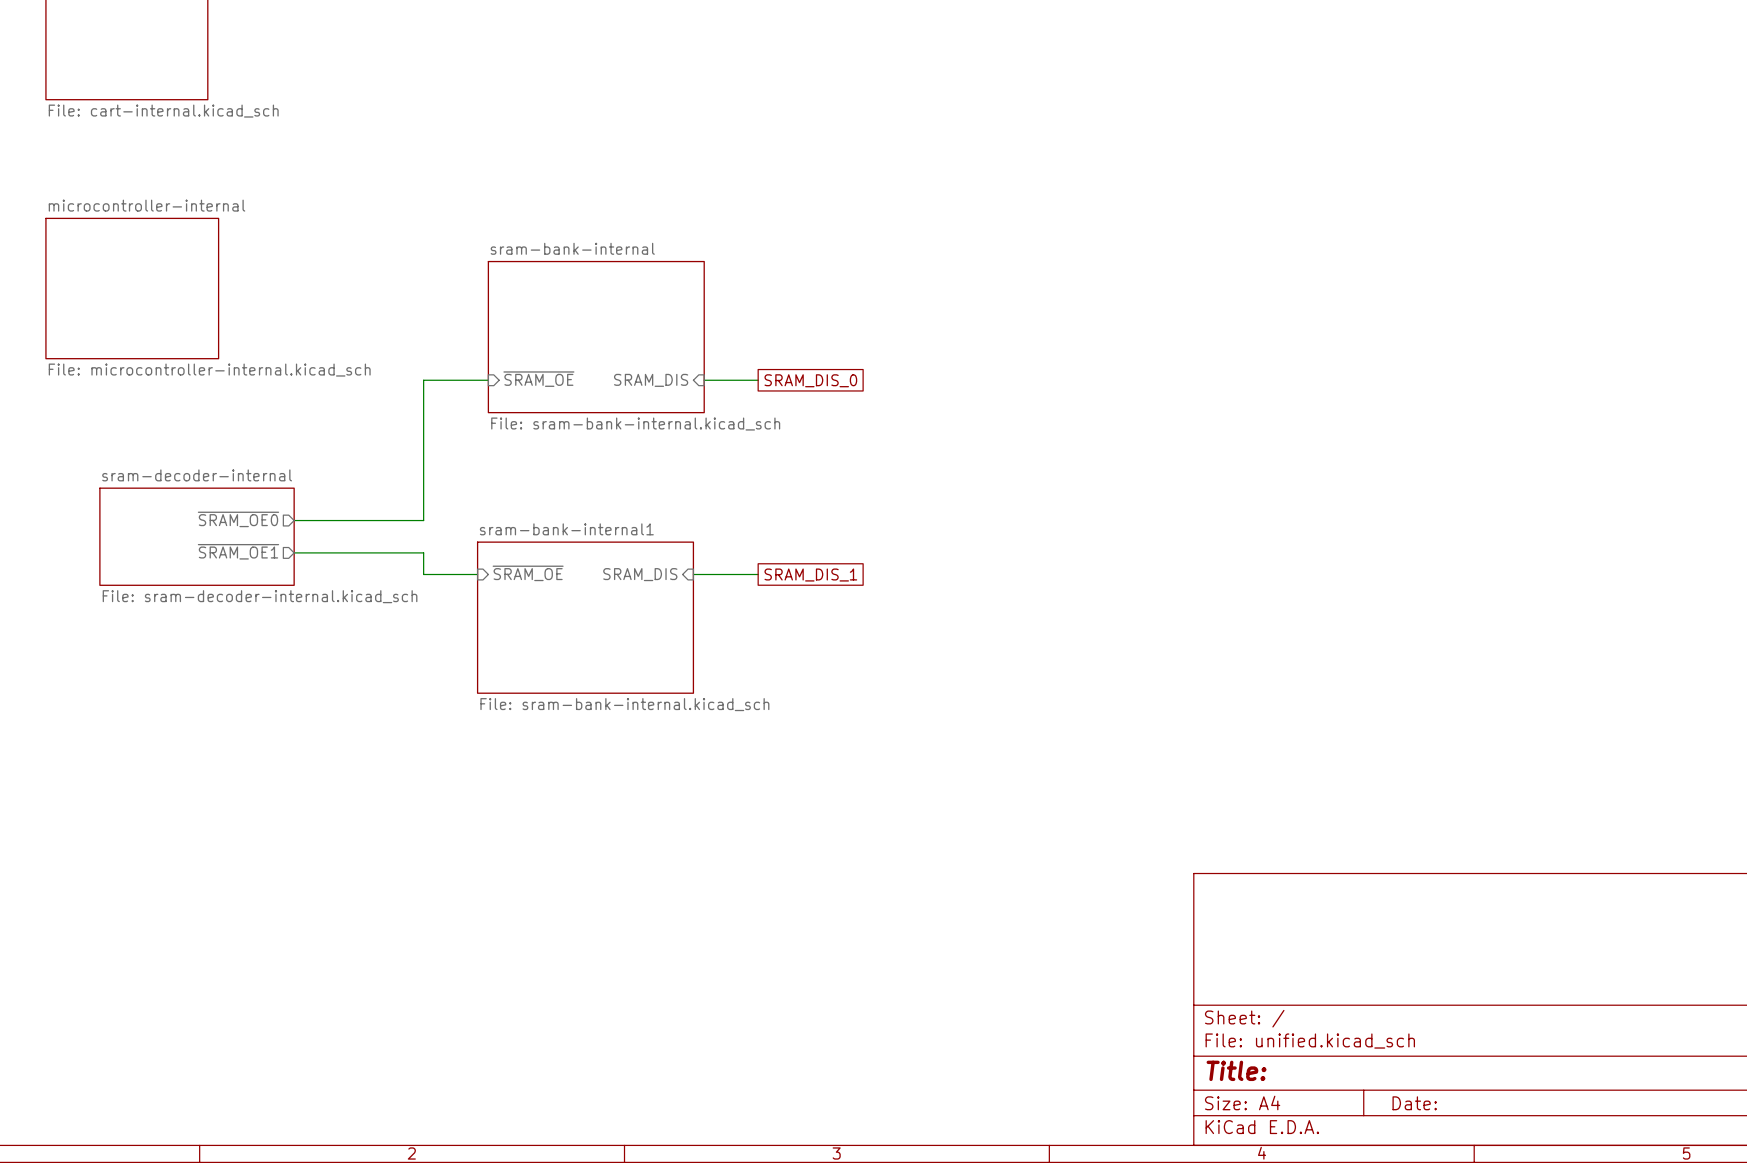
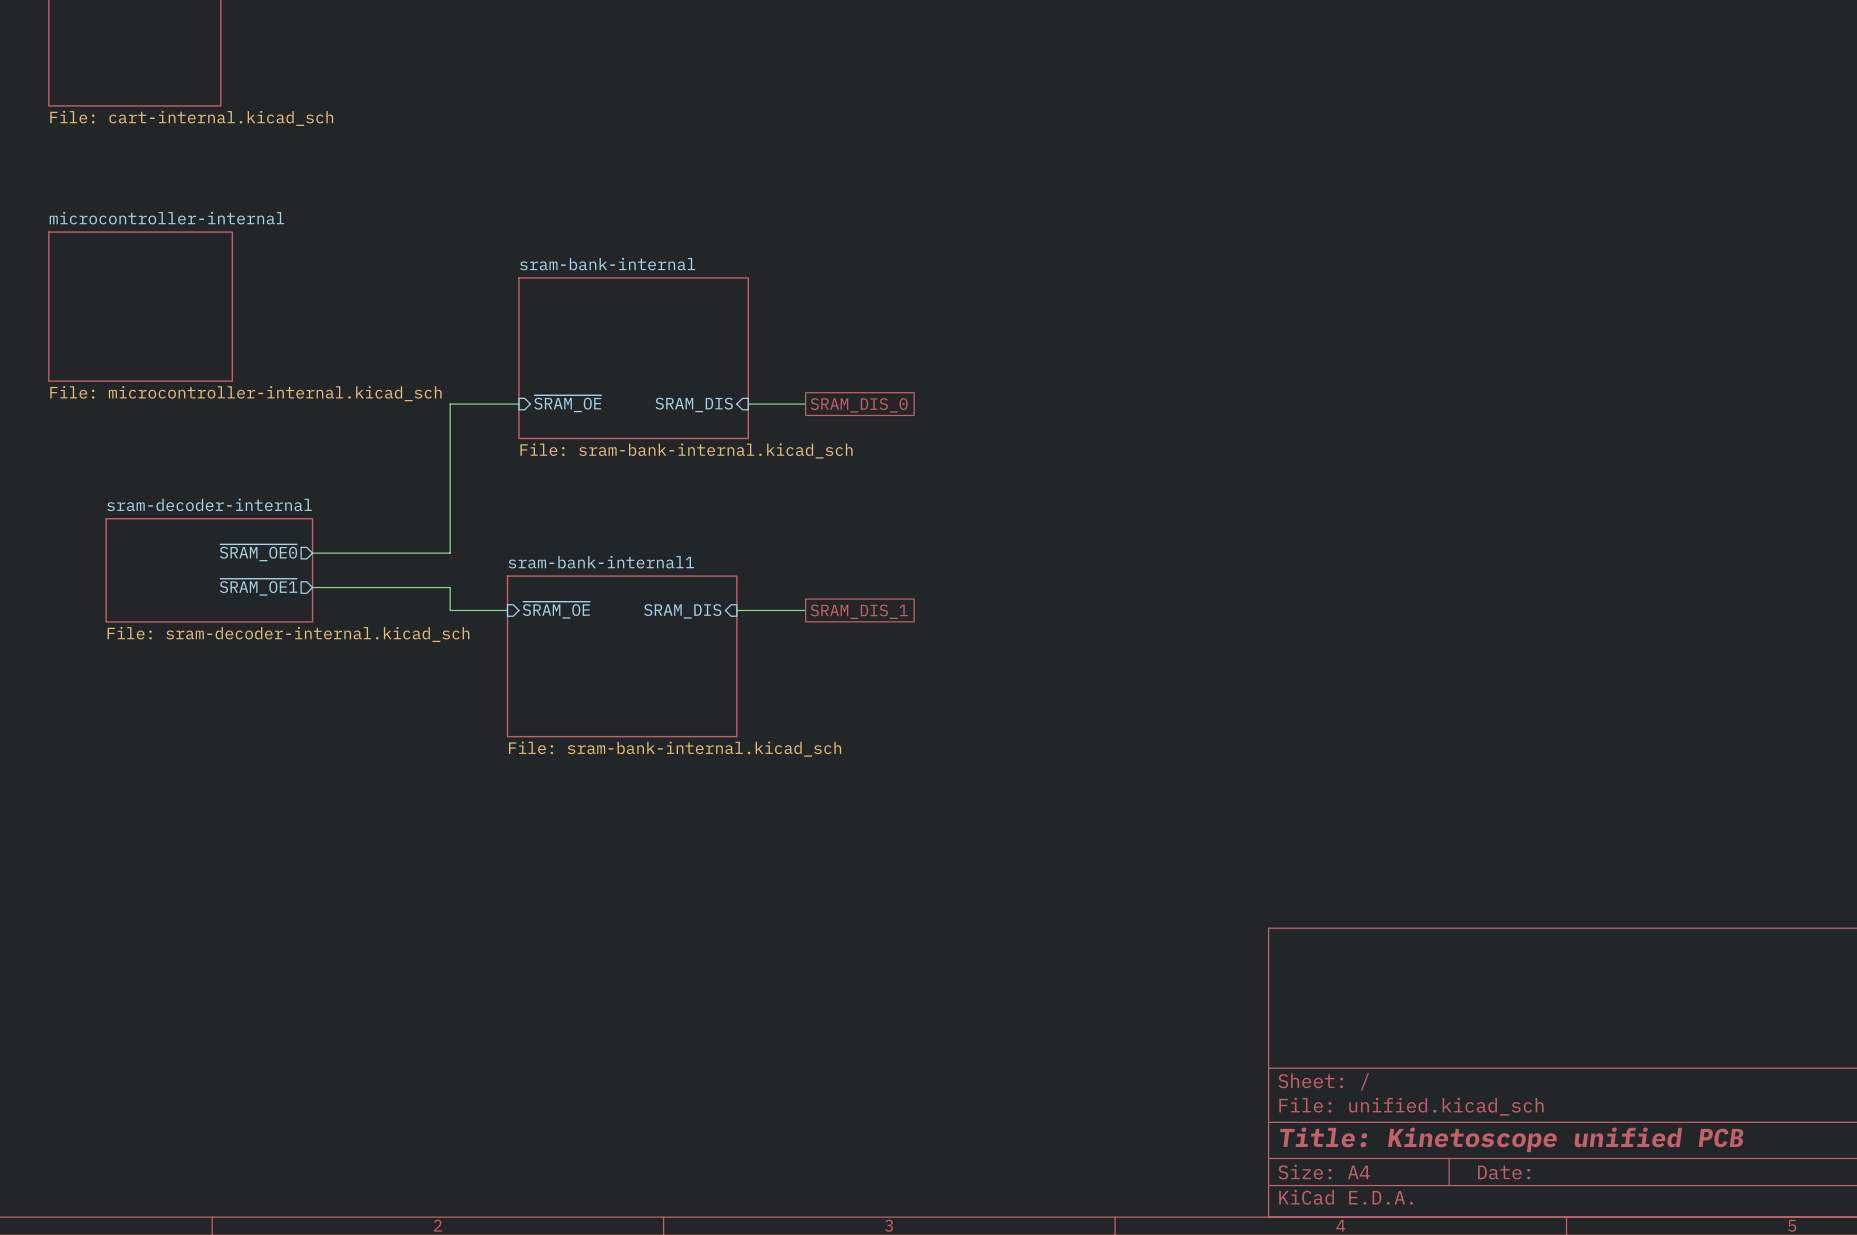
title block: Title: (1236, 1070) -> Title: Kinetoscope unified PCB (1511, 1139)

